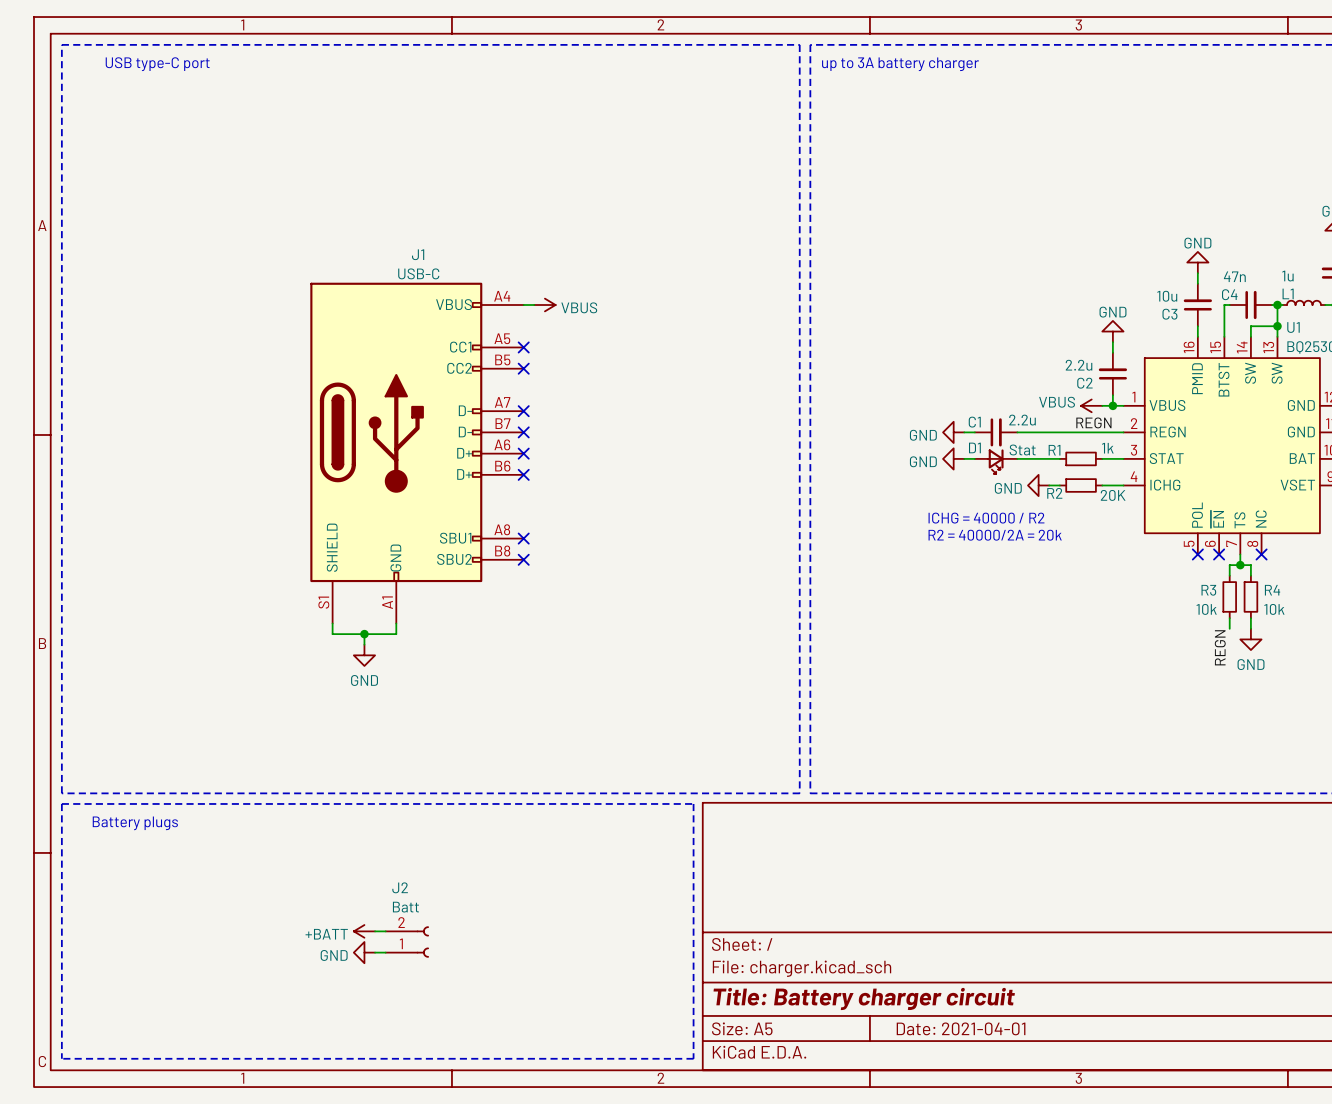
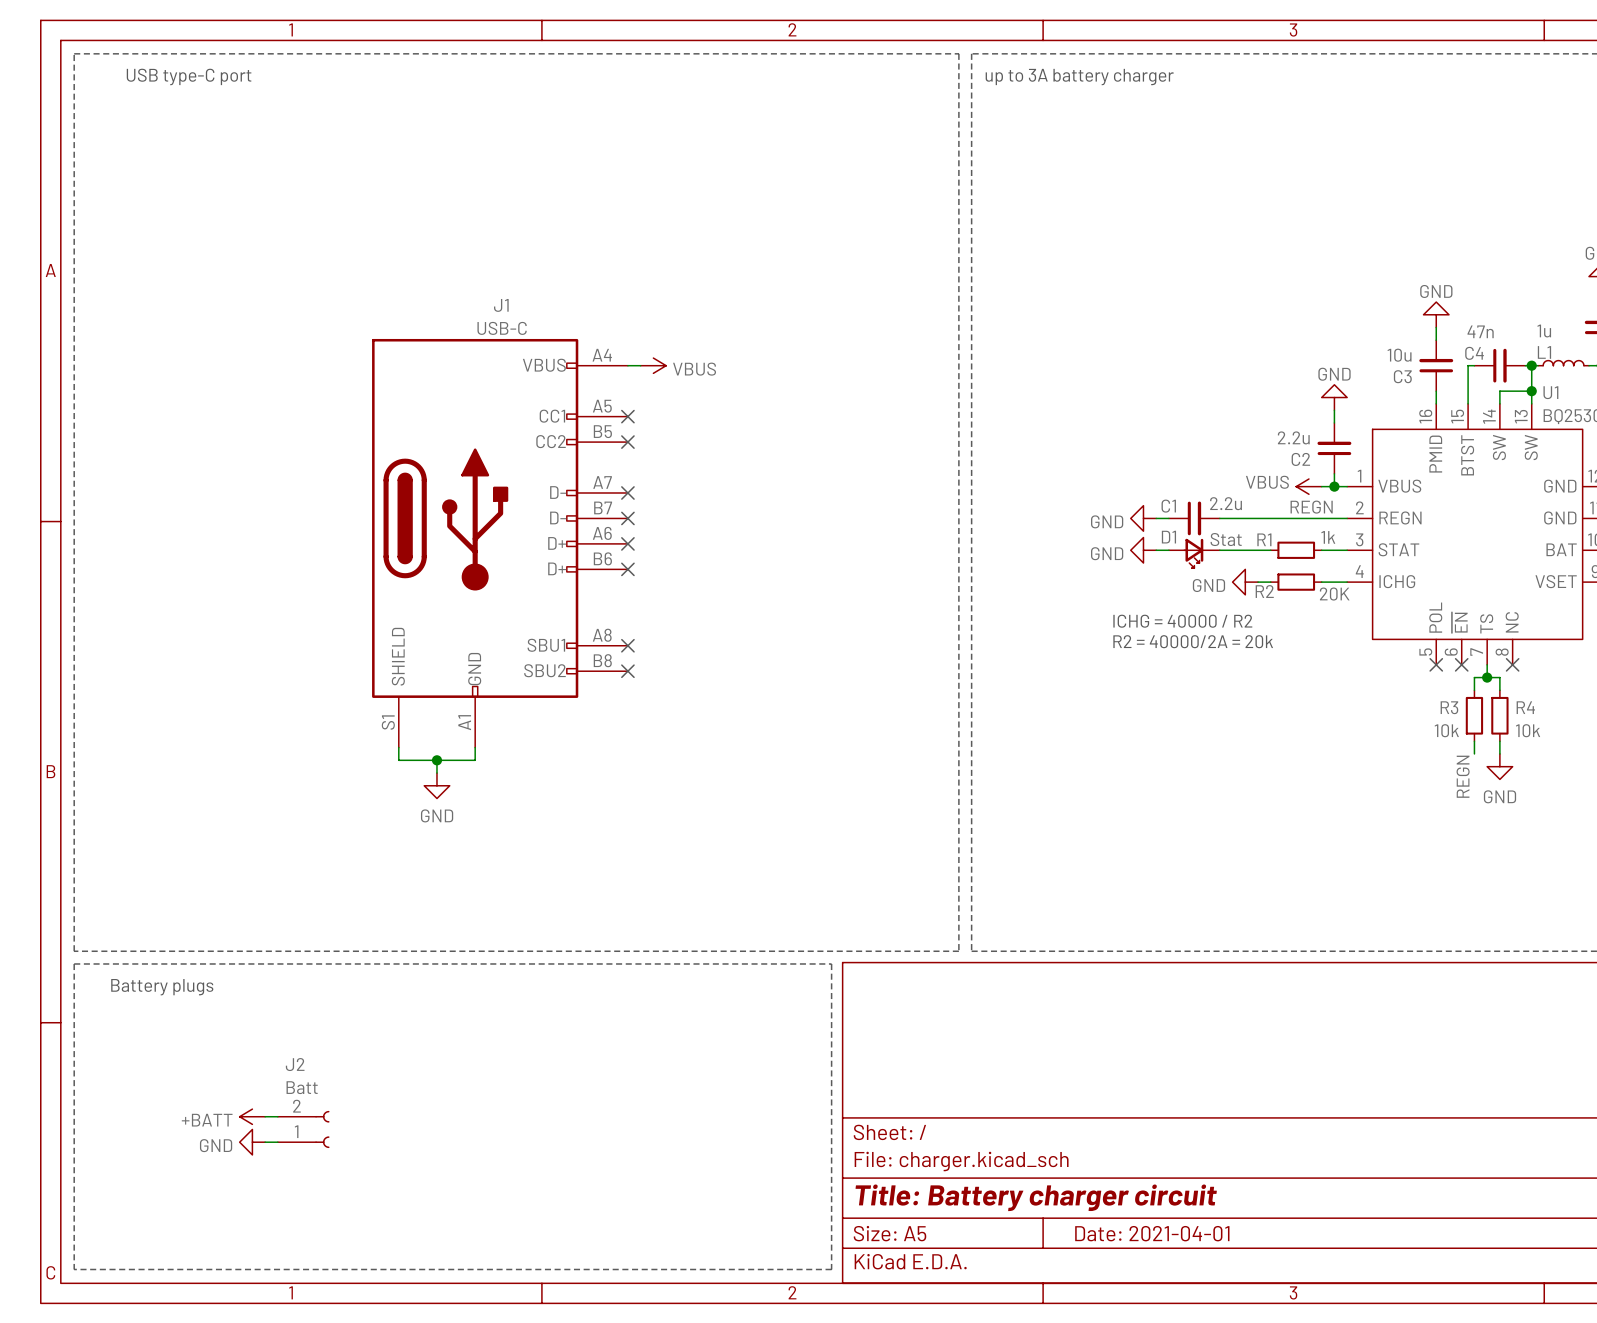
power symbol position: +BATT (364, 931) -> +BATT (252, 1116)
wire: (375, 931) (385, 931) -> (265, 1116) (277, 1116)
J2 position: (407, 941) -> (303, 1129)
power symbol position: GND (364, 952) -> GND (252, 1142)
wire: (375, 952) (385, 952) -> (265, 1142) (277, 1142)

